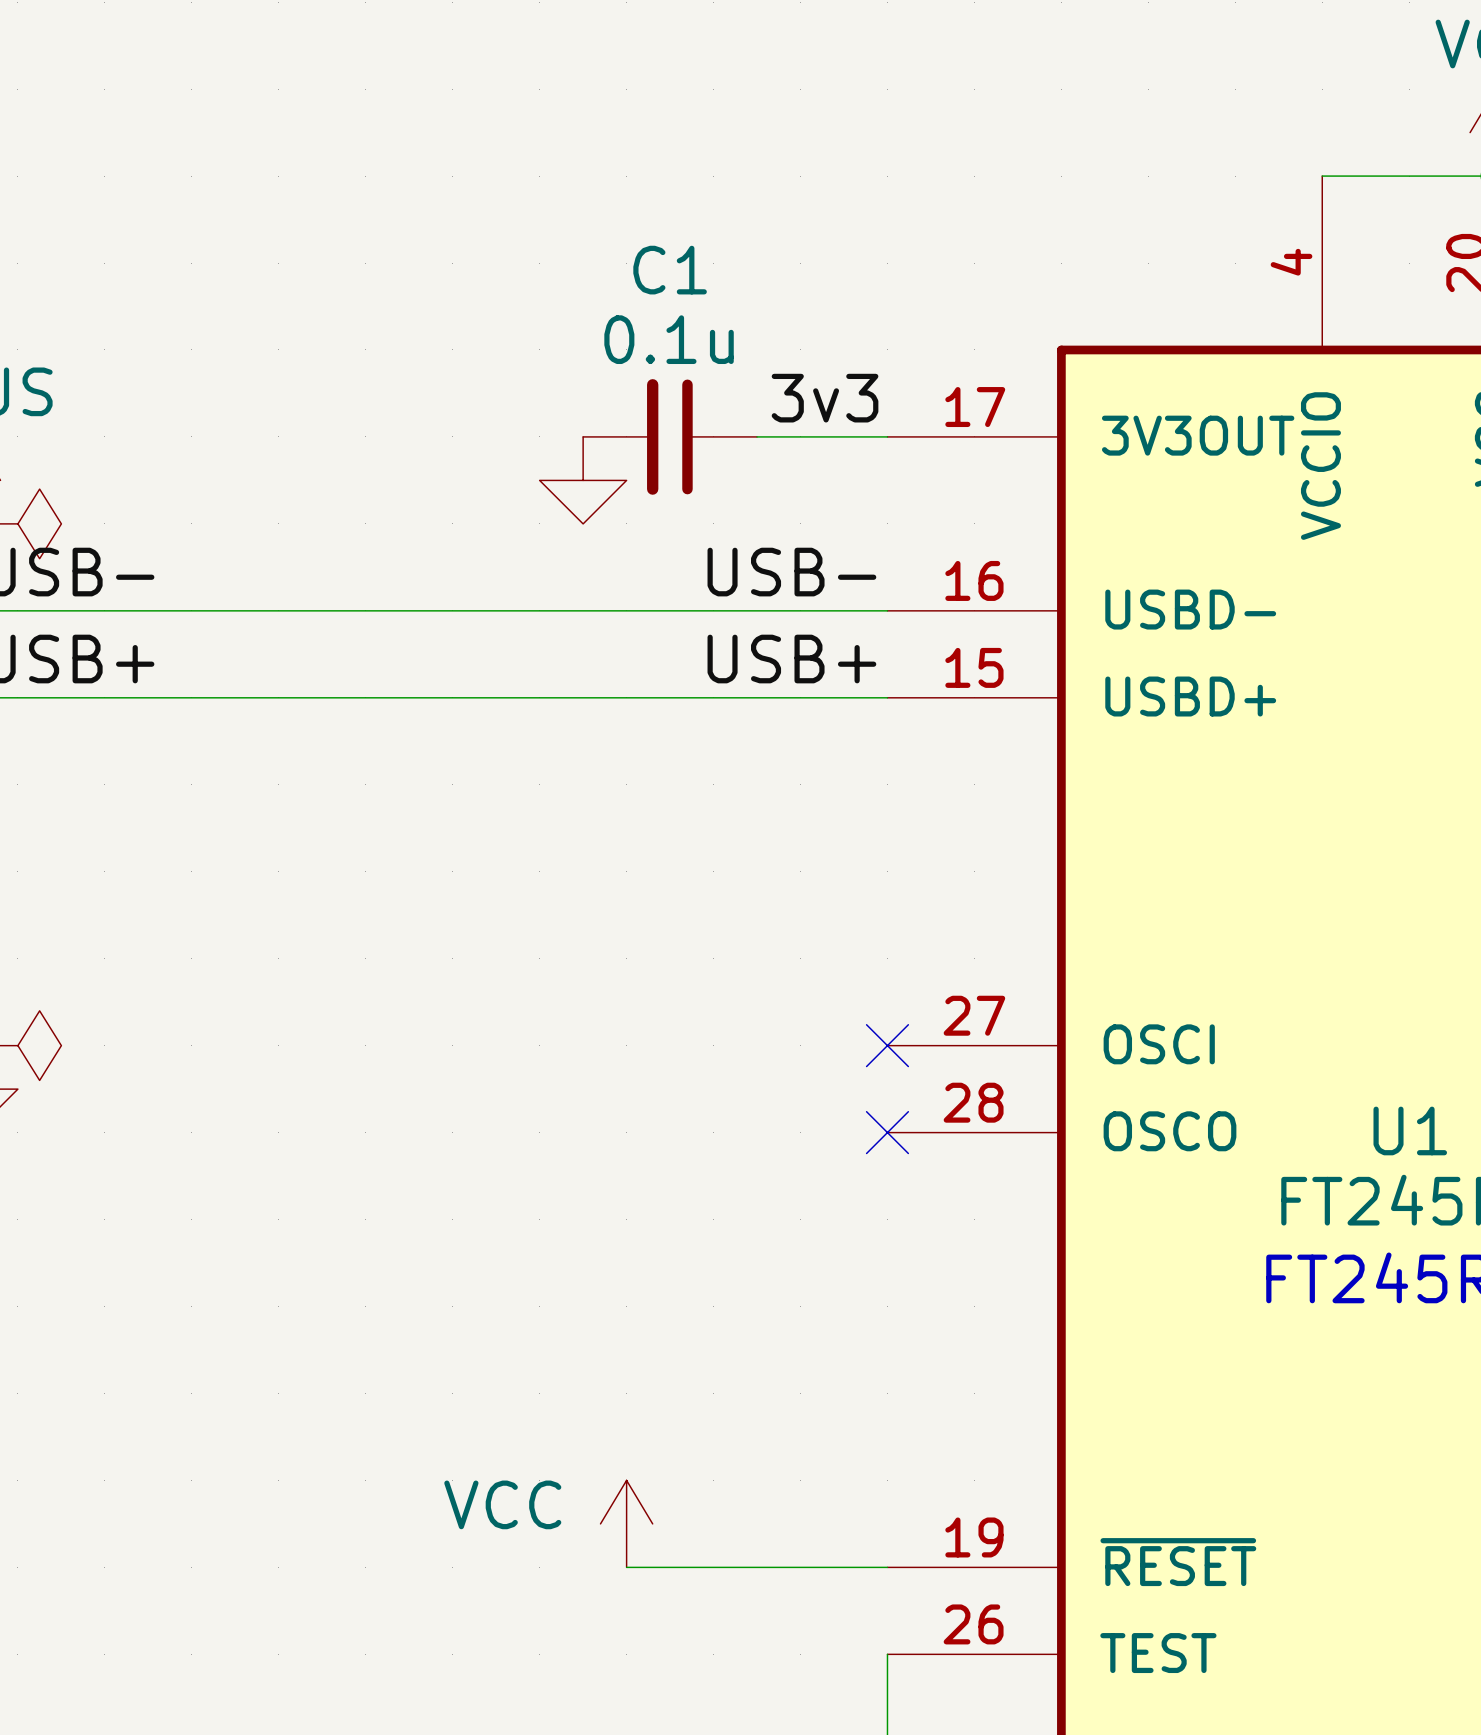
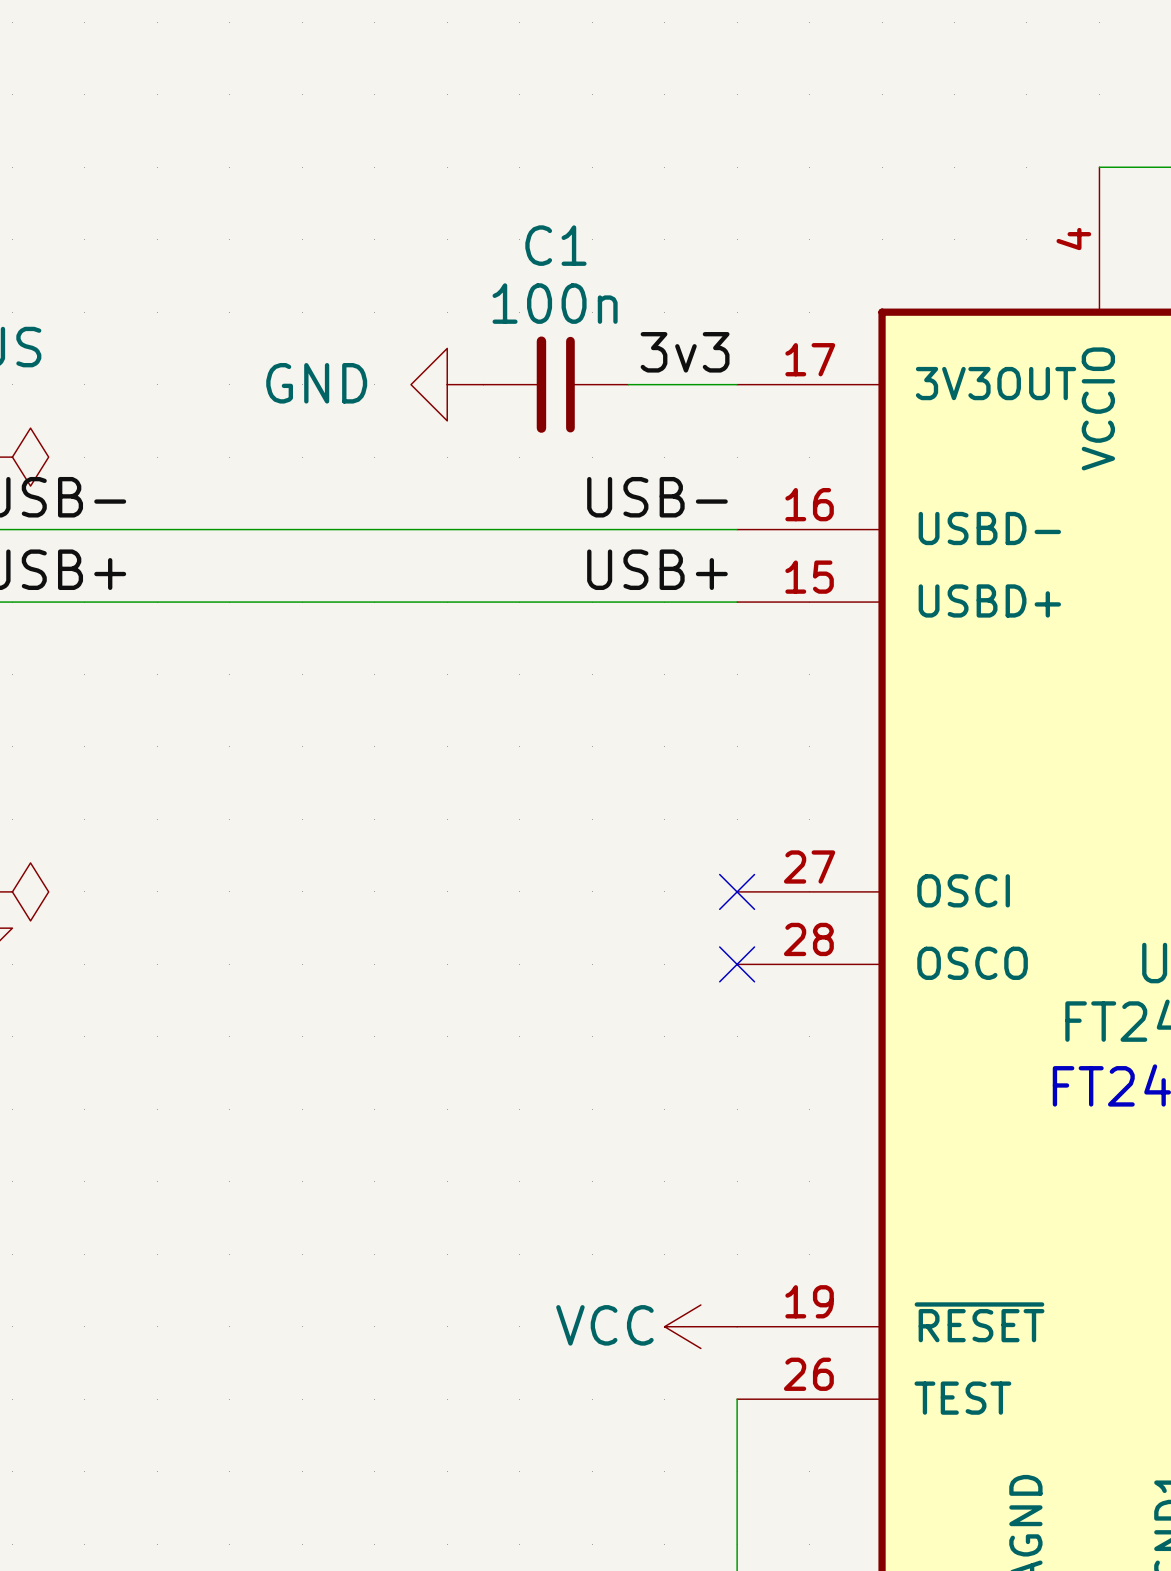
C1 value: 0.1u (669, 339) -> 100n (555, 303)
power symbol: none -> GND (447, 384)
power symbol: (583, 480) -> none
power symbol rotation: 0° (626, 1523) -> 90° counterclockwise (700, 1326)
power symbol position: VCC (626, 1523) -> VCC (700, 1326)
wire: (626, 1567) (887, 1567) -> none

